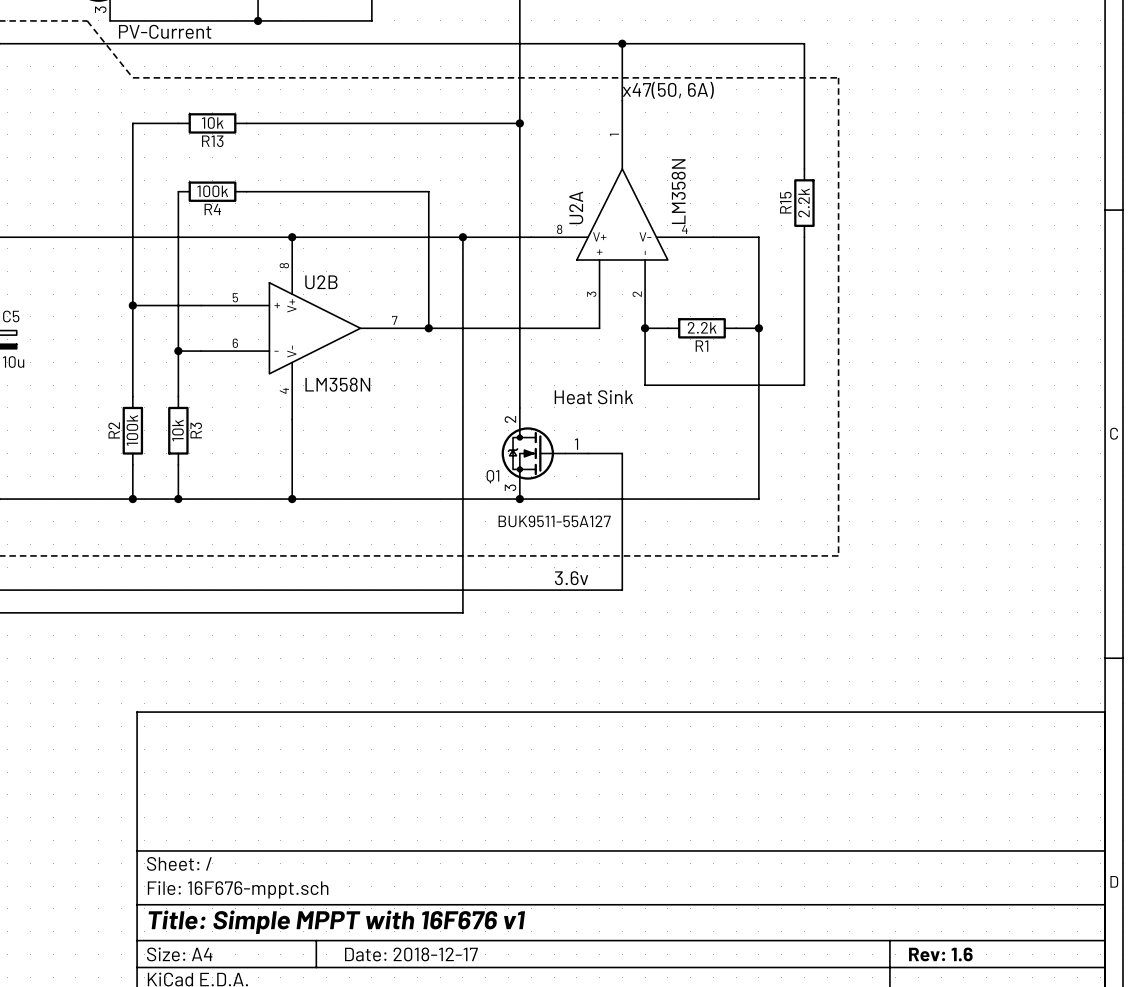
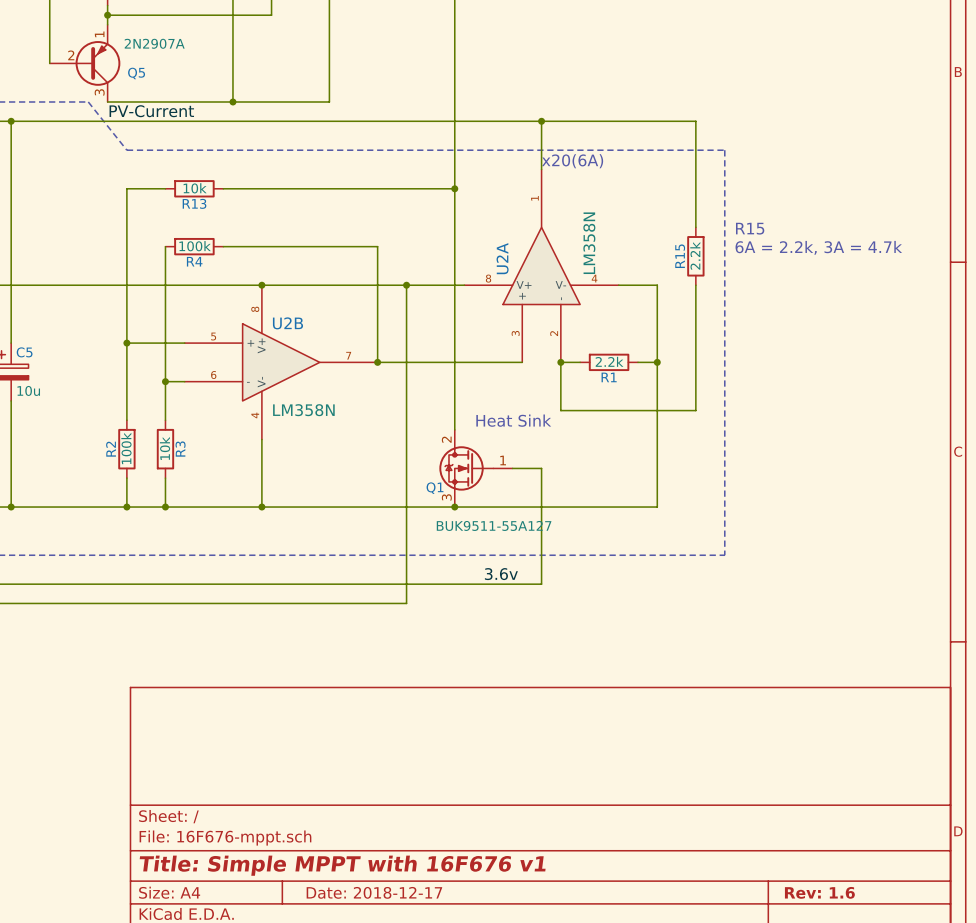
text: x47(50, 6A) (668, 90) -> x20(6A) (572, 161)
text: none -> R15 (750, 228)
text: none -> 6A = 2.2k, 3A = 4.7k (818, 247)

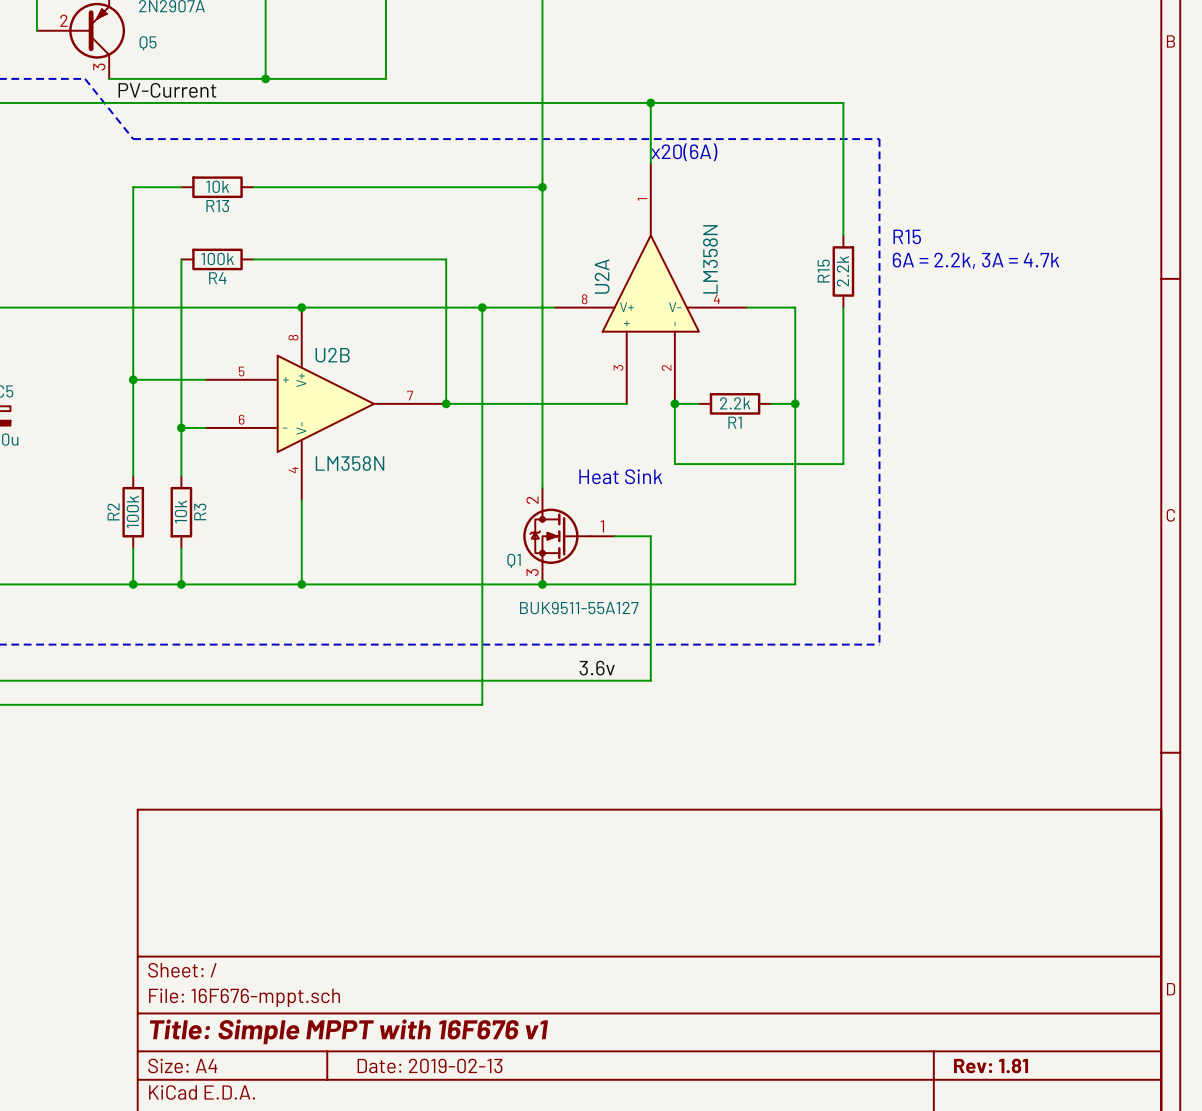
title block: Date: 2018-12-17 (374, 892) -> Date: 2019-02-13 (430, 1065)
title block: Rev: 1.6 (819, 892) -> Rev: 1.81 (991, 1065)

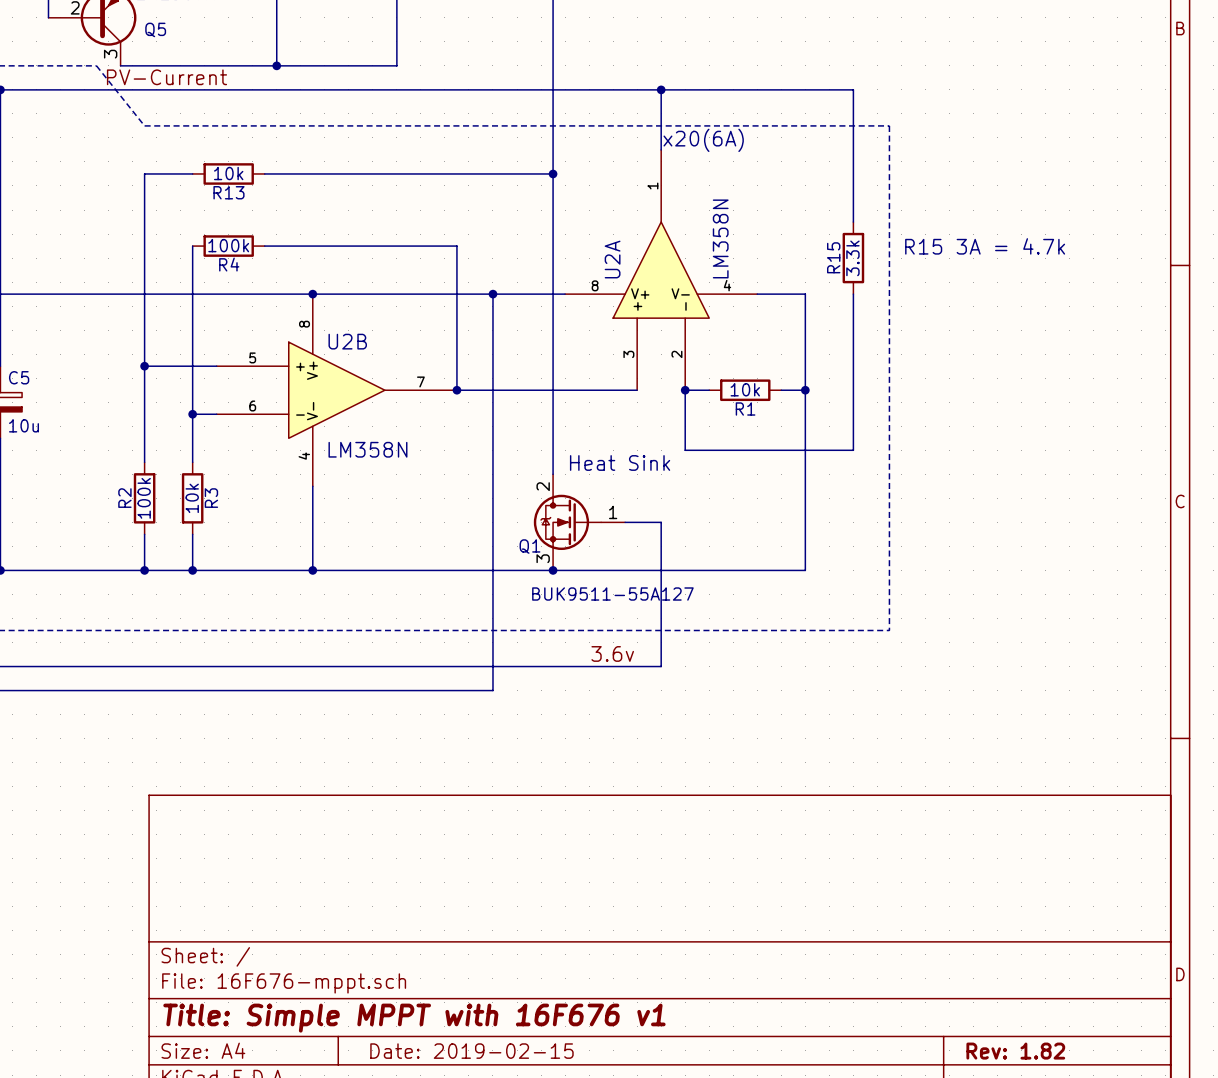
text: R15 (907, 236) -> none
text: 6A = 2.2k, 3A = 4.7k (976, 260) -> R15 3A = 4.7k (985, 246)
R15 value: 2.2k (842, 271) -> 3.3k (852, 258)
R1 value: 2.2k (735, 403) -> 10k (745, 389)
title block: Date: 2019-02-13 (430, 1065) -> Date: 2019-02-15 (471, 1051)
title block: Rev: 1.81 (991, 1065) -> Rev: 1.82 (1015, 1051)

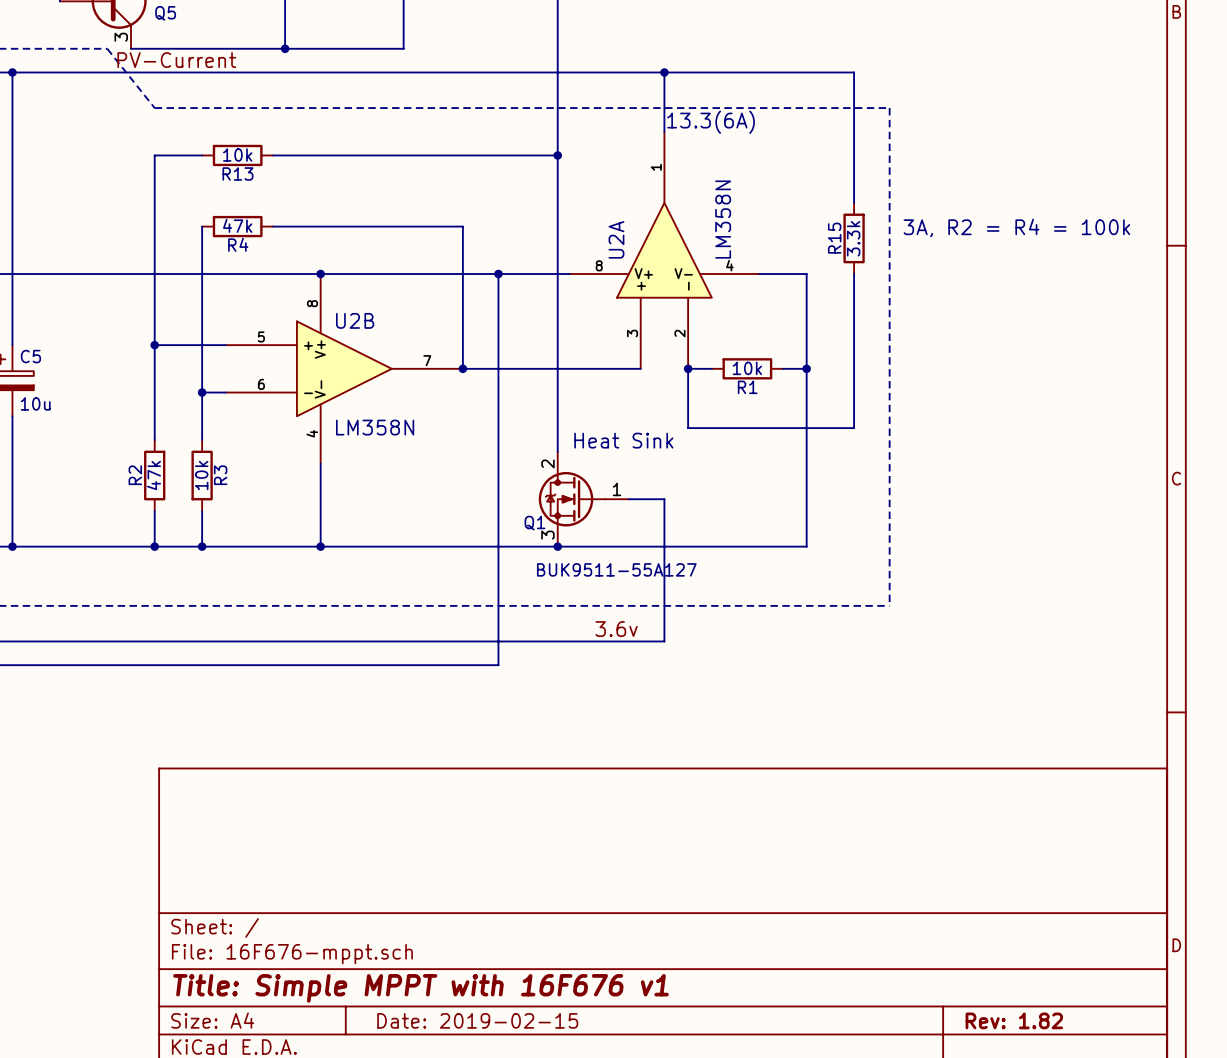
text: x20(6A) (703, 140) -> 13.3(6A) (711, 122)
R4 value: 100k (228, 245) -> 47k (237, 225)
text: R15 3A = 4.7k (985, 246) -> 3A, R2 = R4 = 100k (1016, 227)
R2 value: 100k (144, 498) -> 47k (153, 475)

